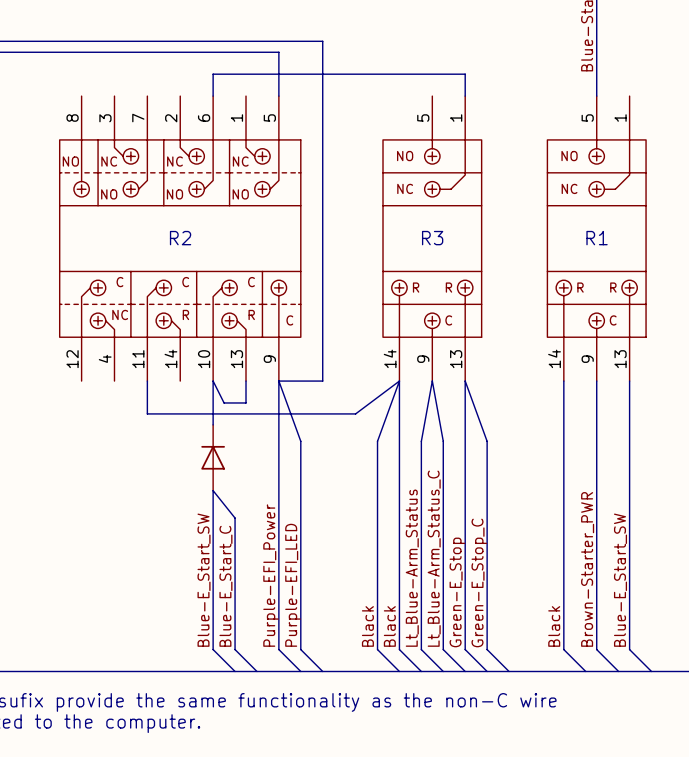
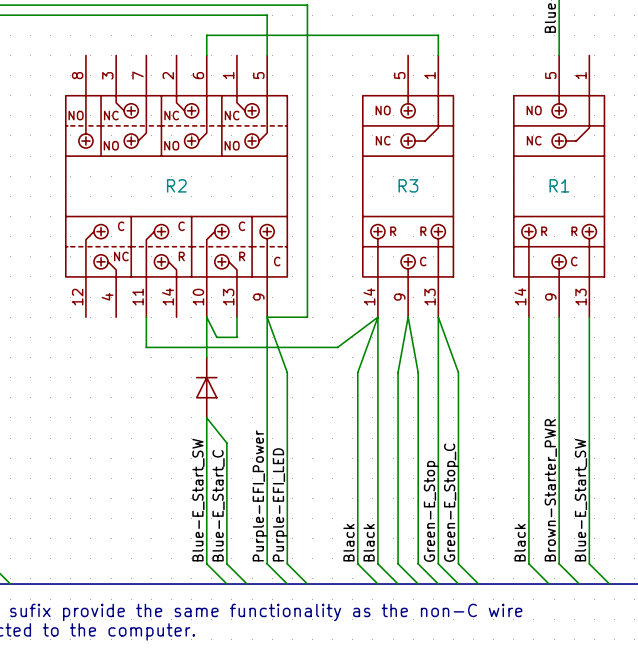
label: Lt_Blue-Arm_Status_C (434, 558) -> none
label: Lt_Blue-Arm_Status (412, 568) -> none

